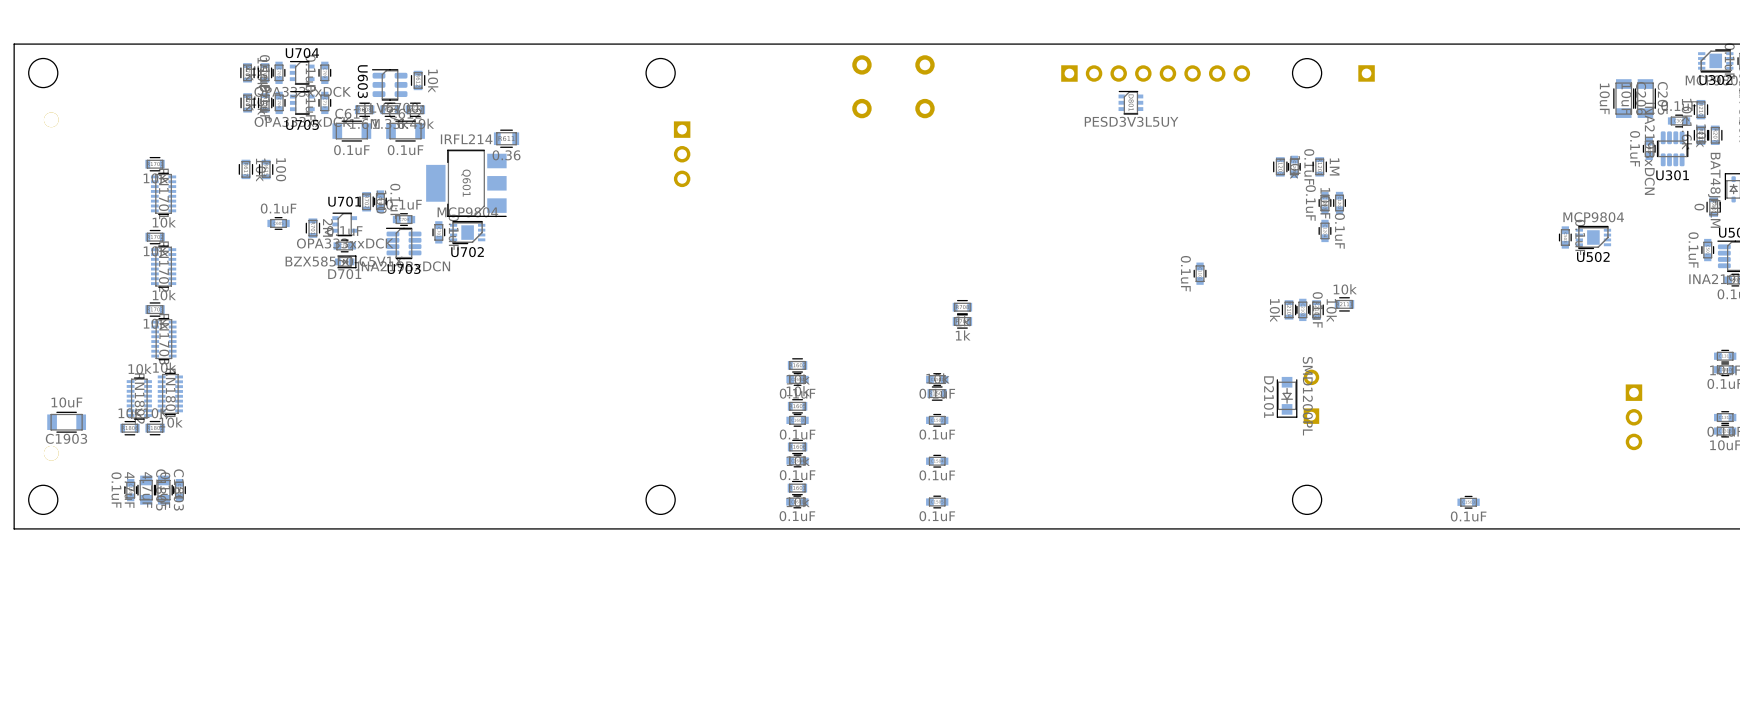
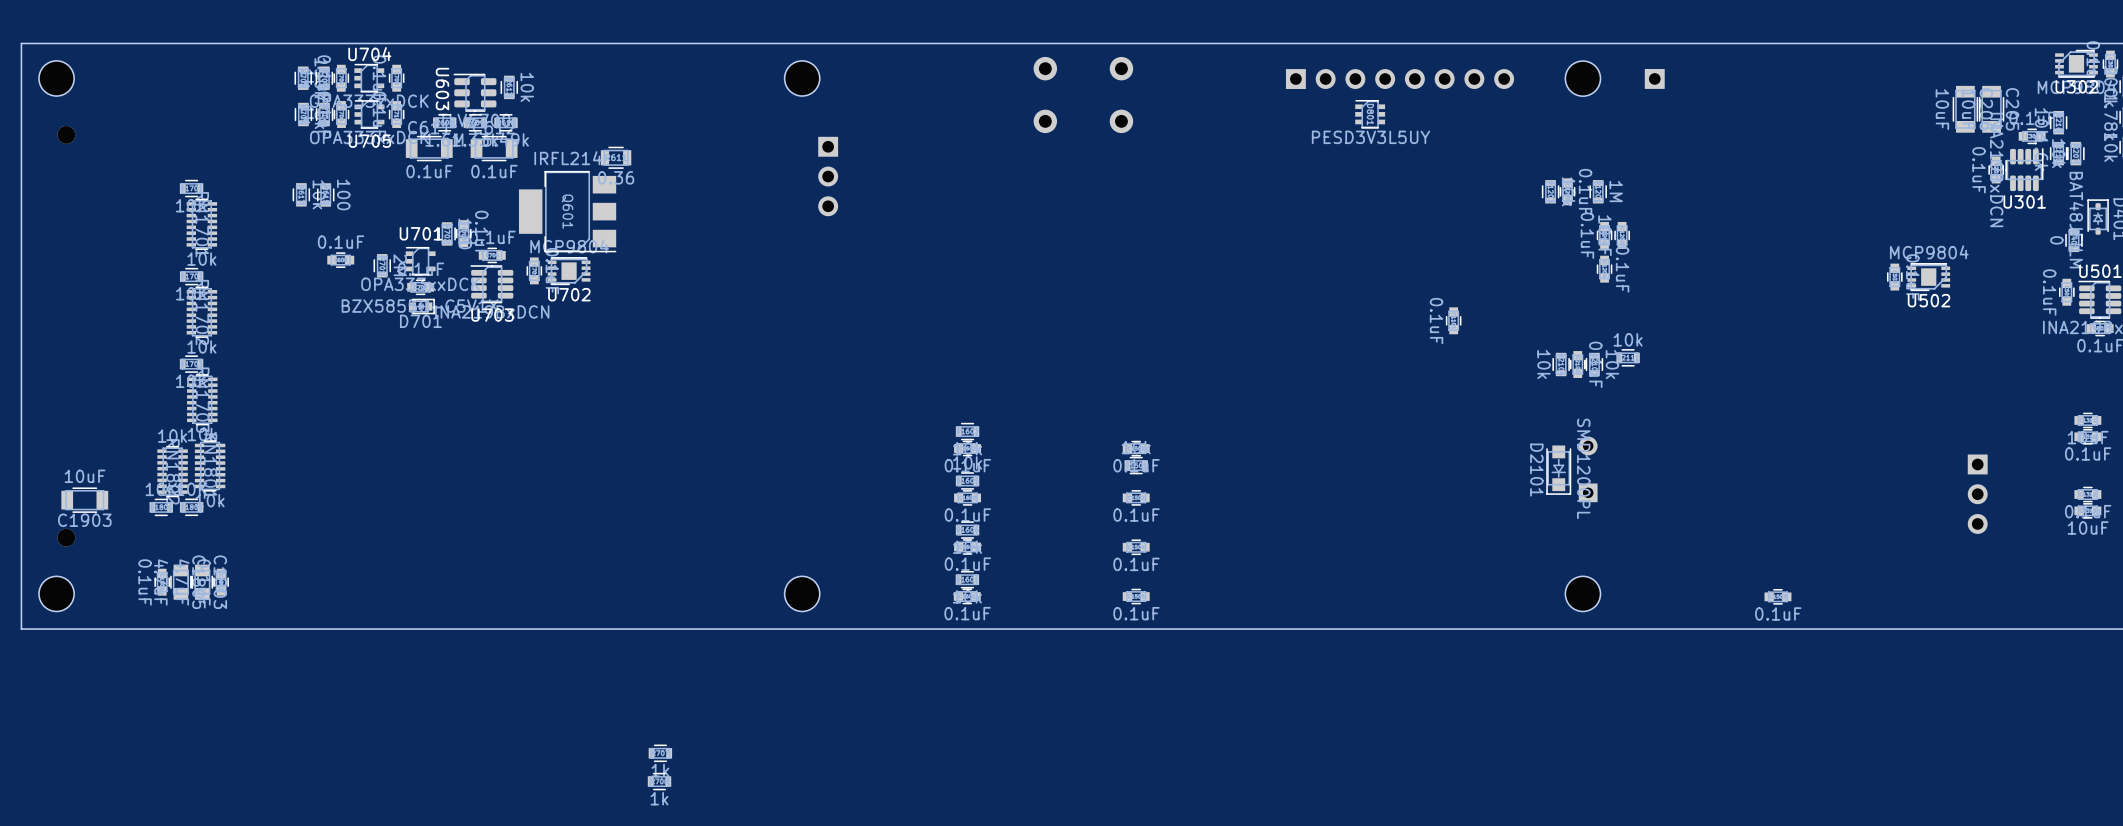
part position: (962, 307) -> (659, 781)
part position: (962, 321) -> (660, 753)

